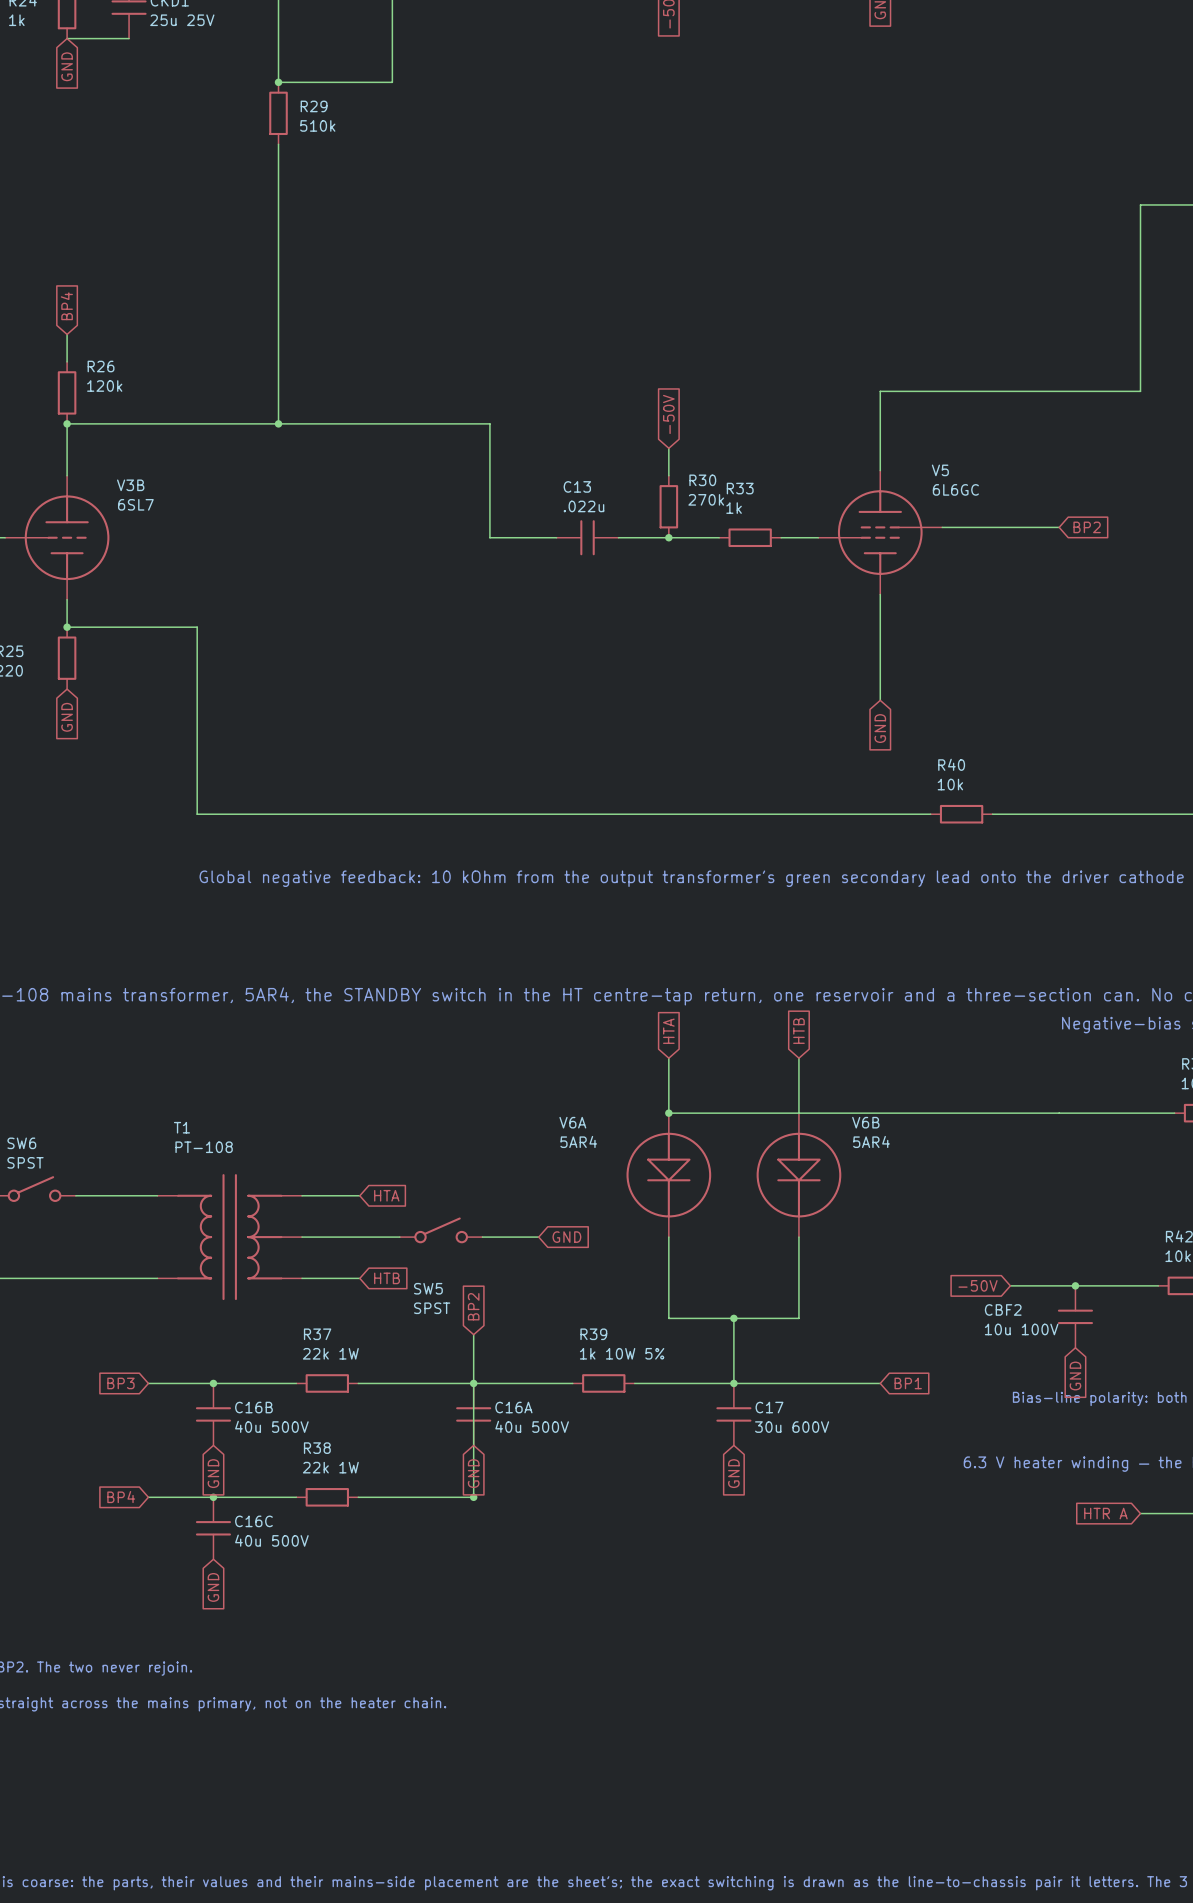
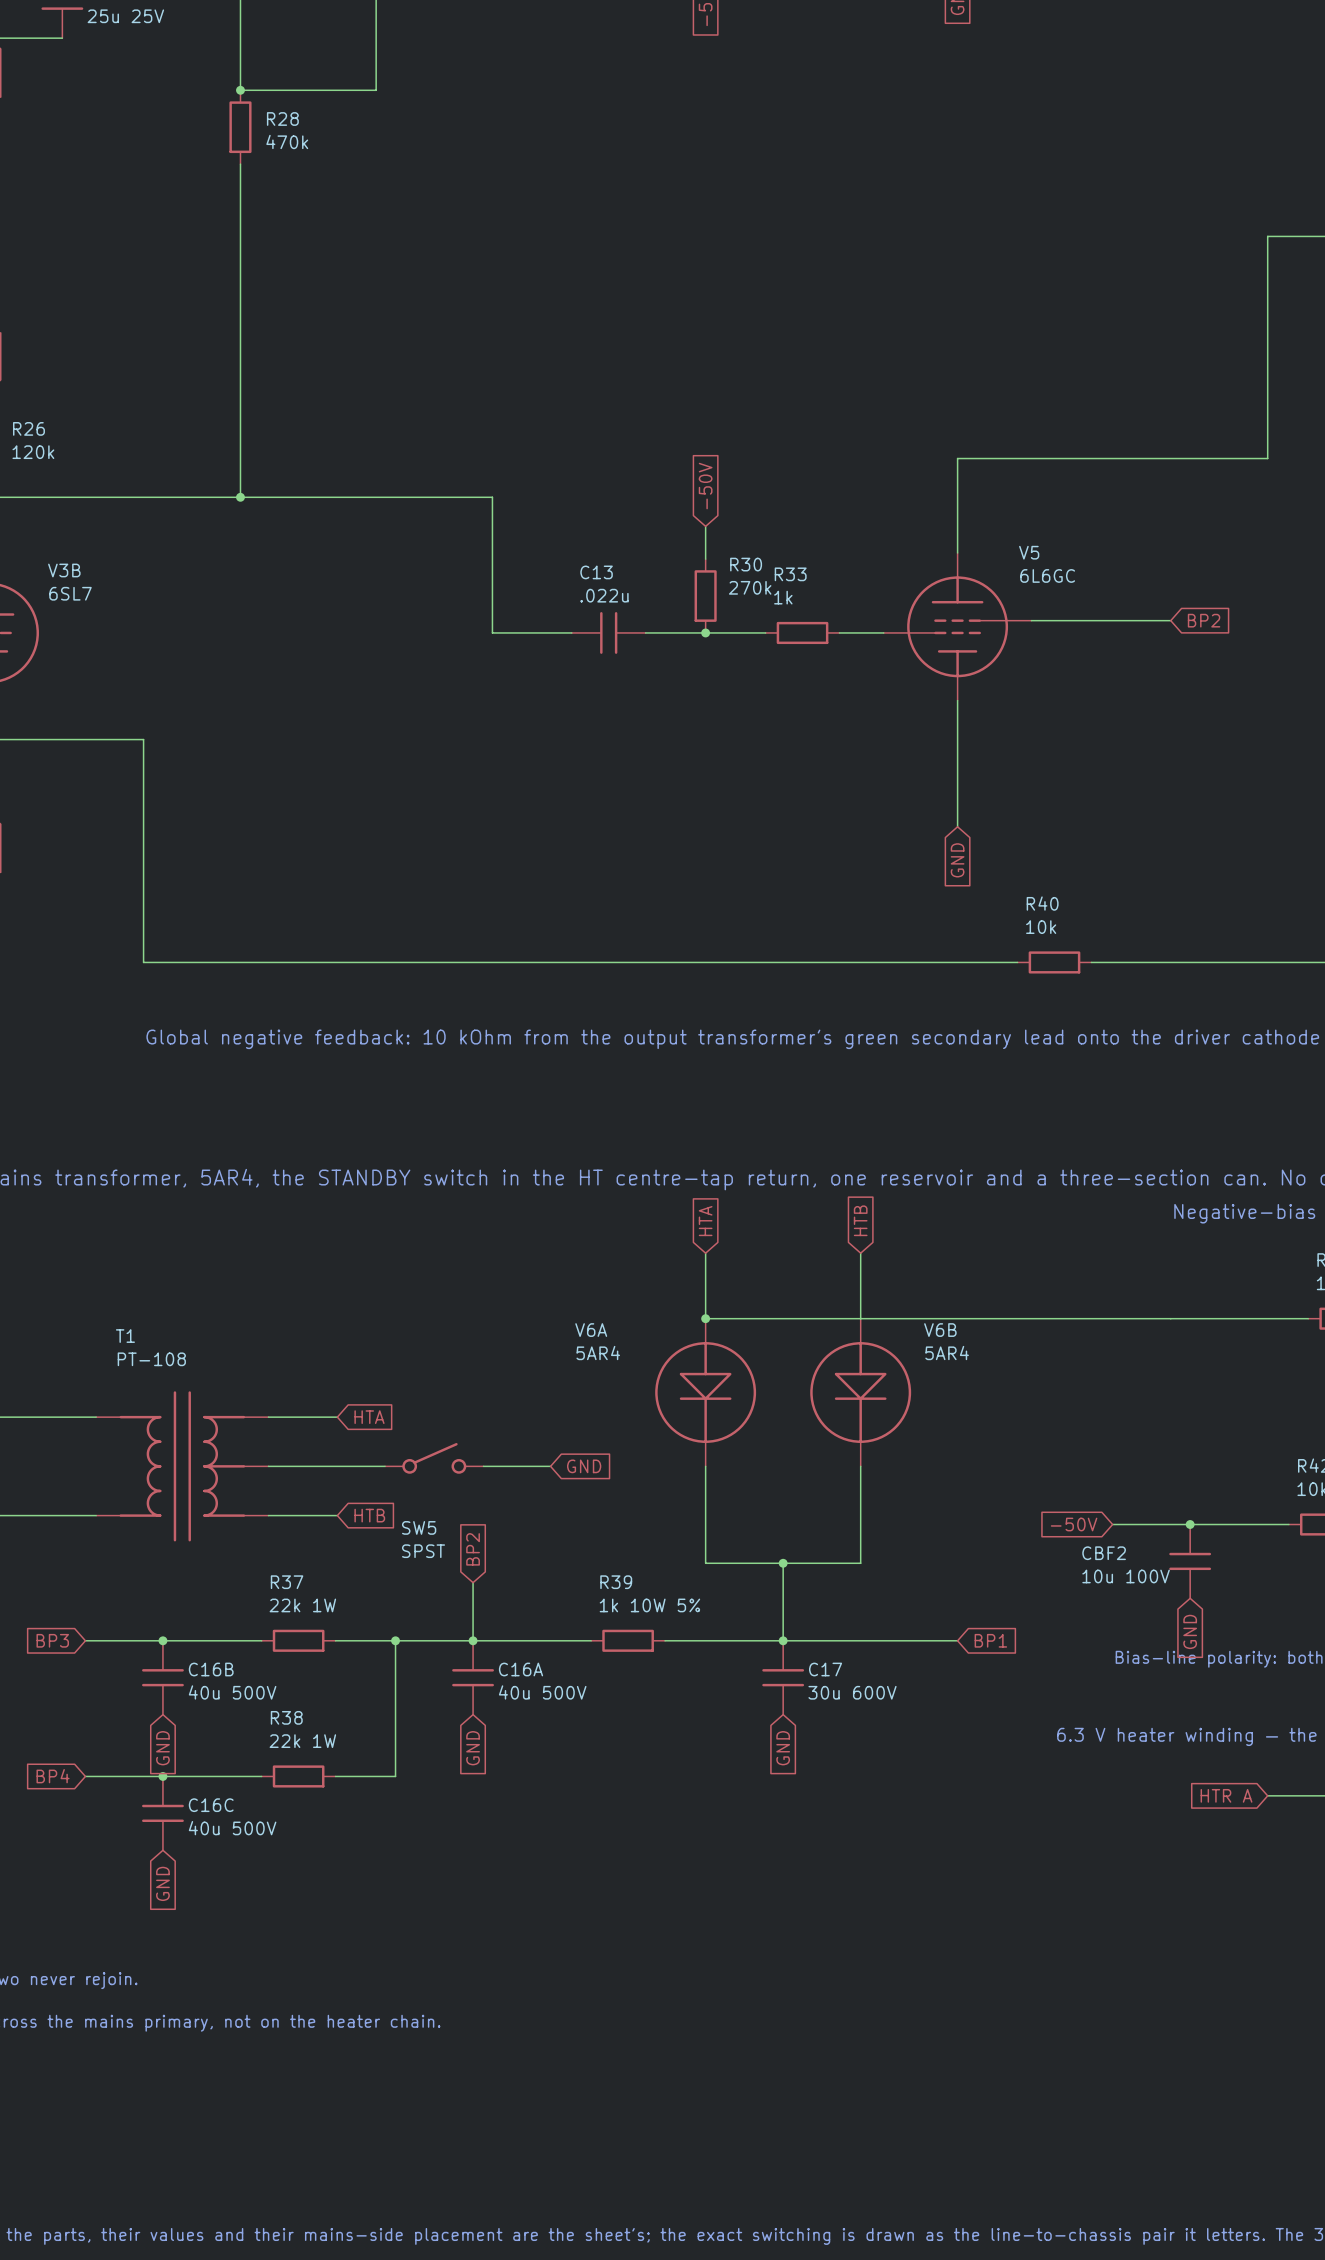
R29 name: R29 (314, 106) -> R28 (282, 119)
R29 value: 510k (317, 125) -> 470k (287, 141)
junction: none -> (395, 1640)
wire: (473, 1383) (473, 1497) (408, 1497) -> (395, 1640) (395, 1776)
junction: (473, 1497) -> none

